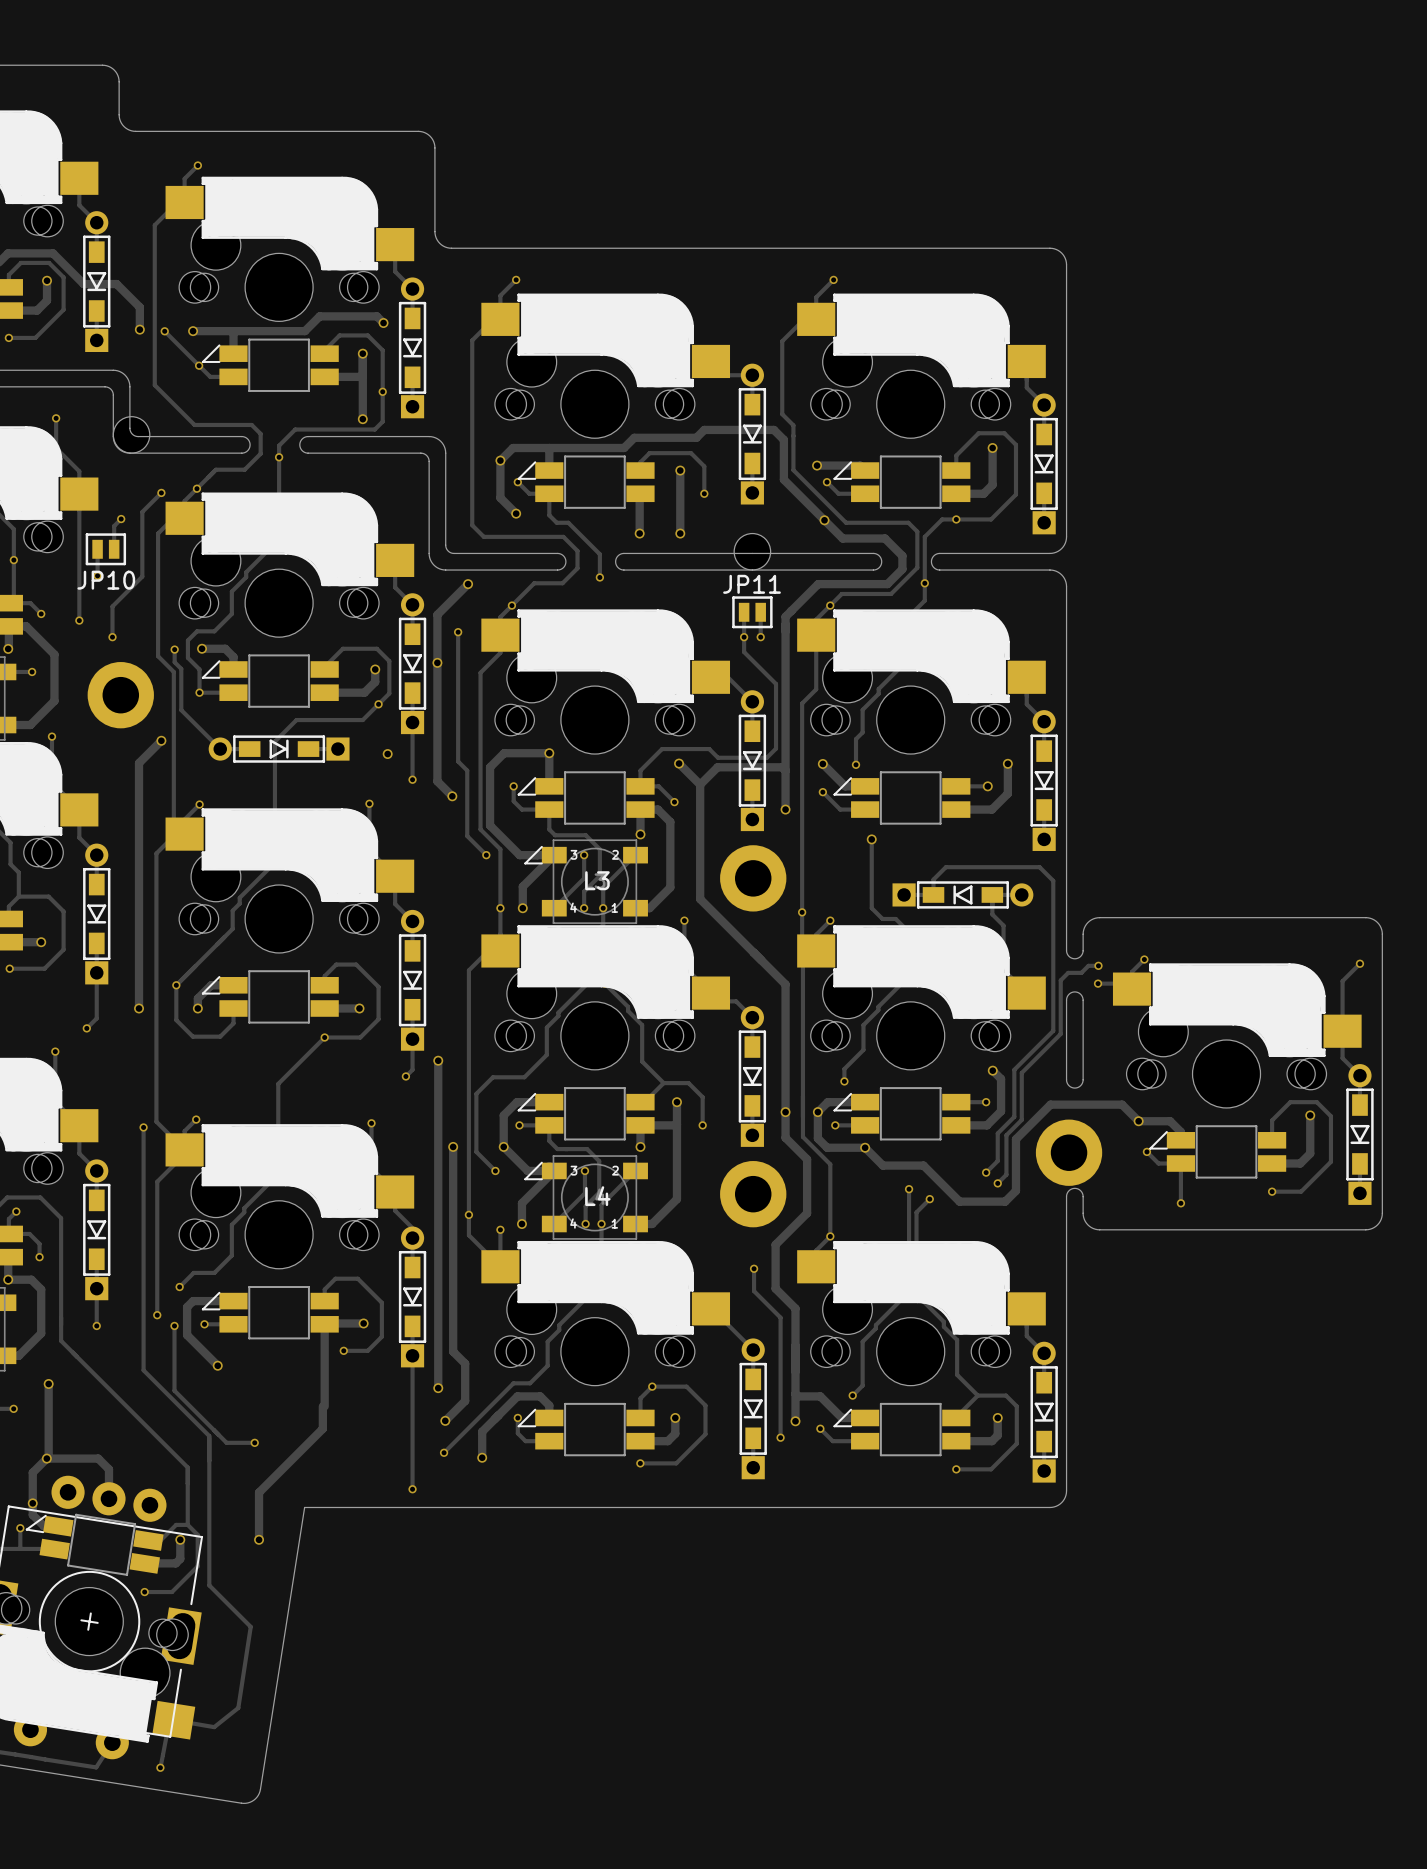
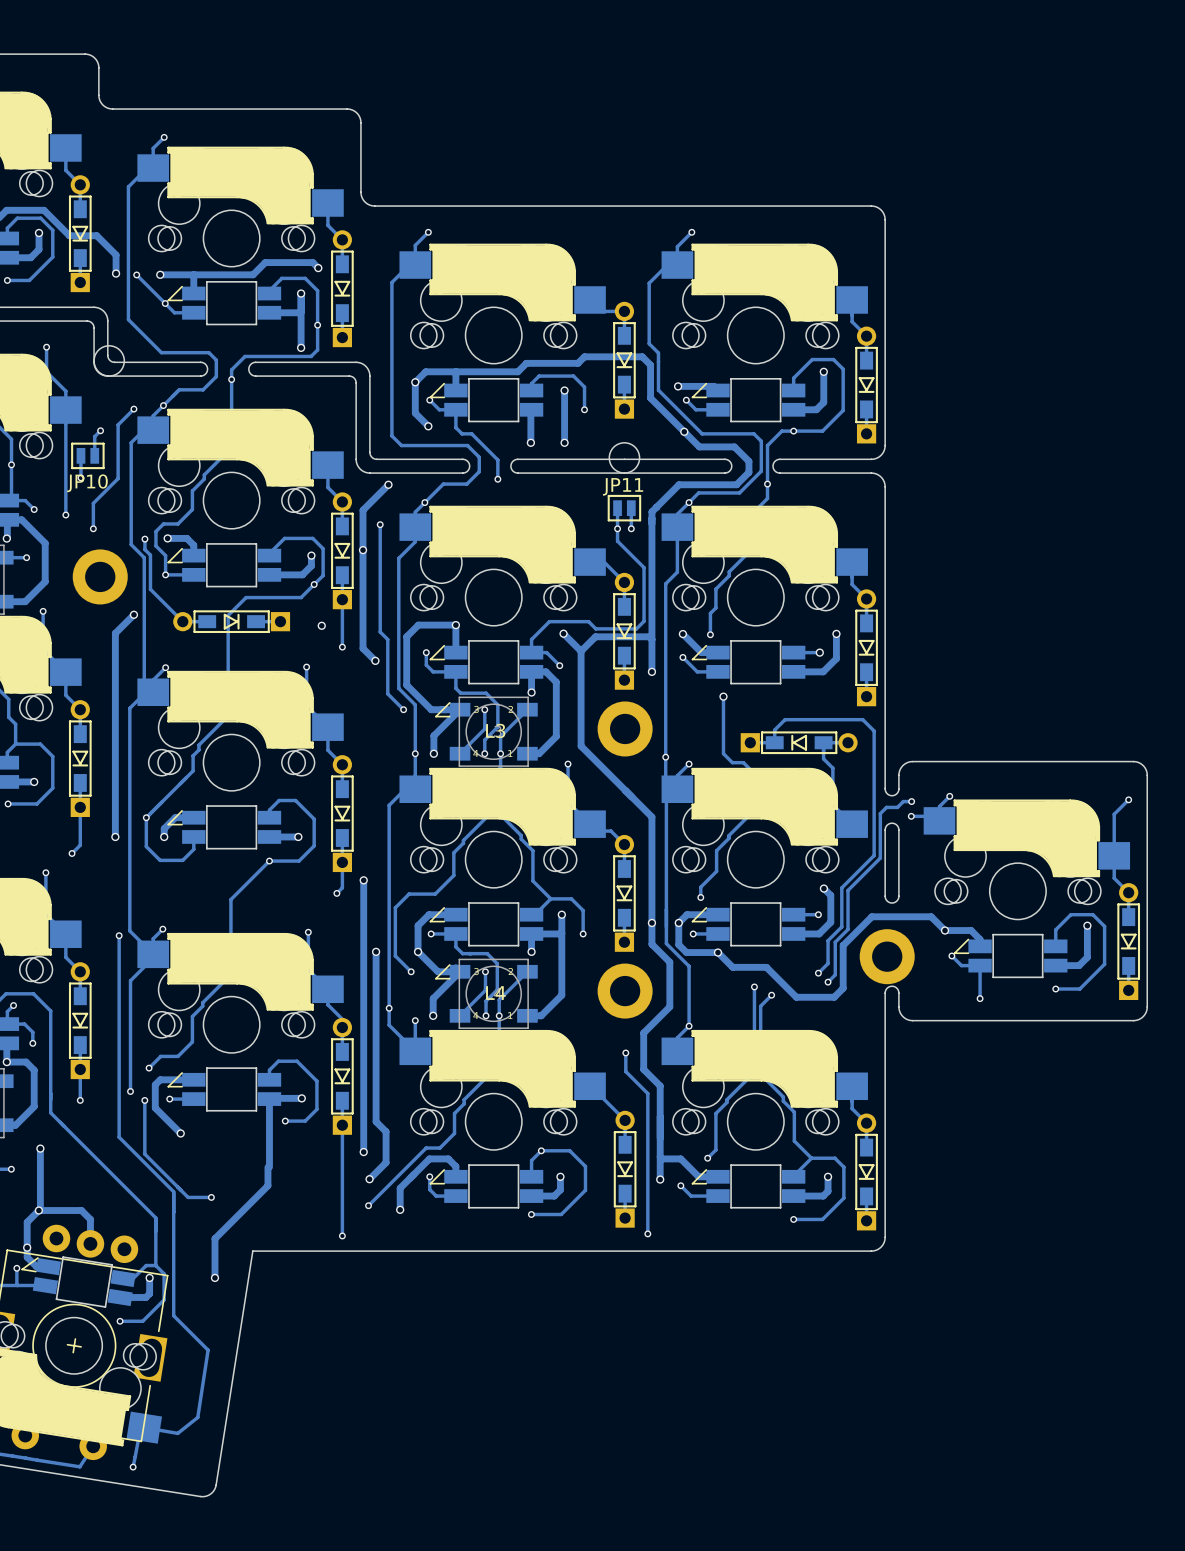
track: none -> (647, 1193) (647, 1233)
via position: (780, 1437) -> (647, 1233)

